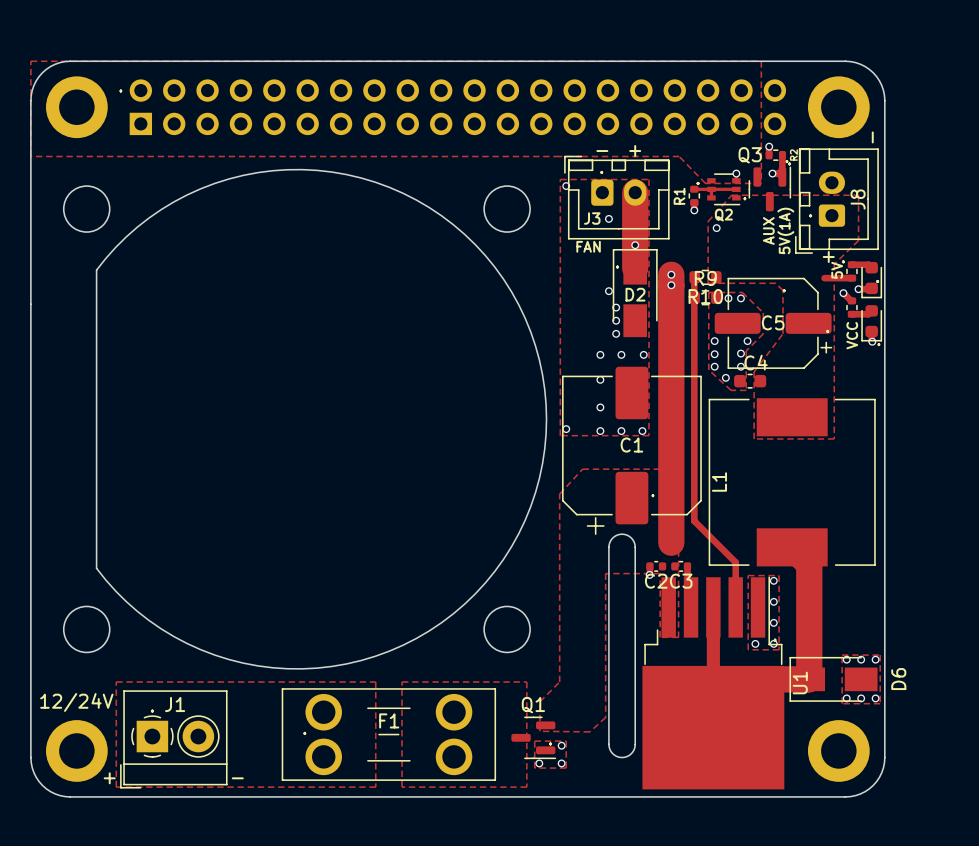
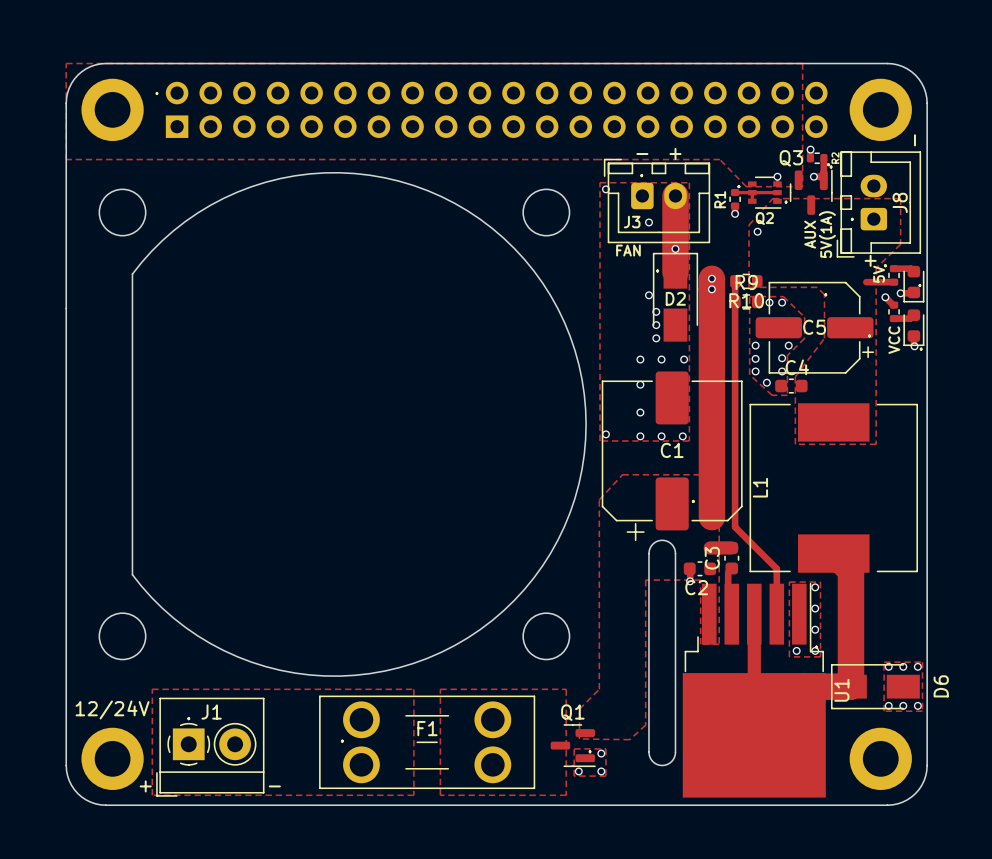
track: (671, 511) (671, 542) -> none
track: none -> (710, 547) (731, 547)
C2 footprint: [646, 560, 667, 572] -> [683, 561, 717, 577]
C3 footprint: [671, 560, 692, 572] -> [724, 541, 740, 575]

